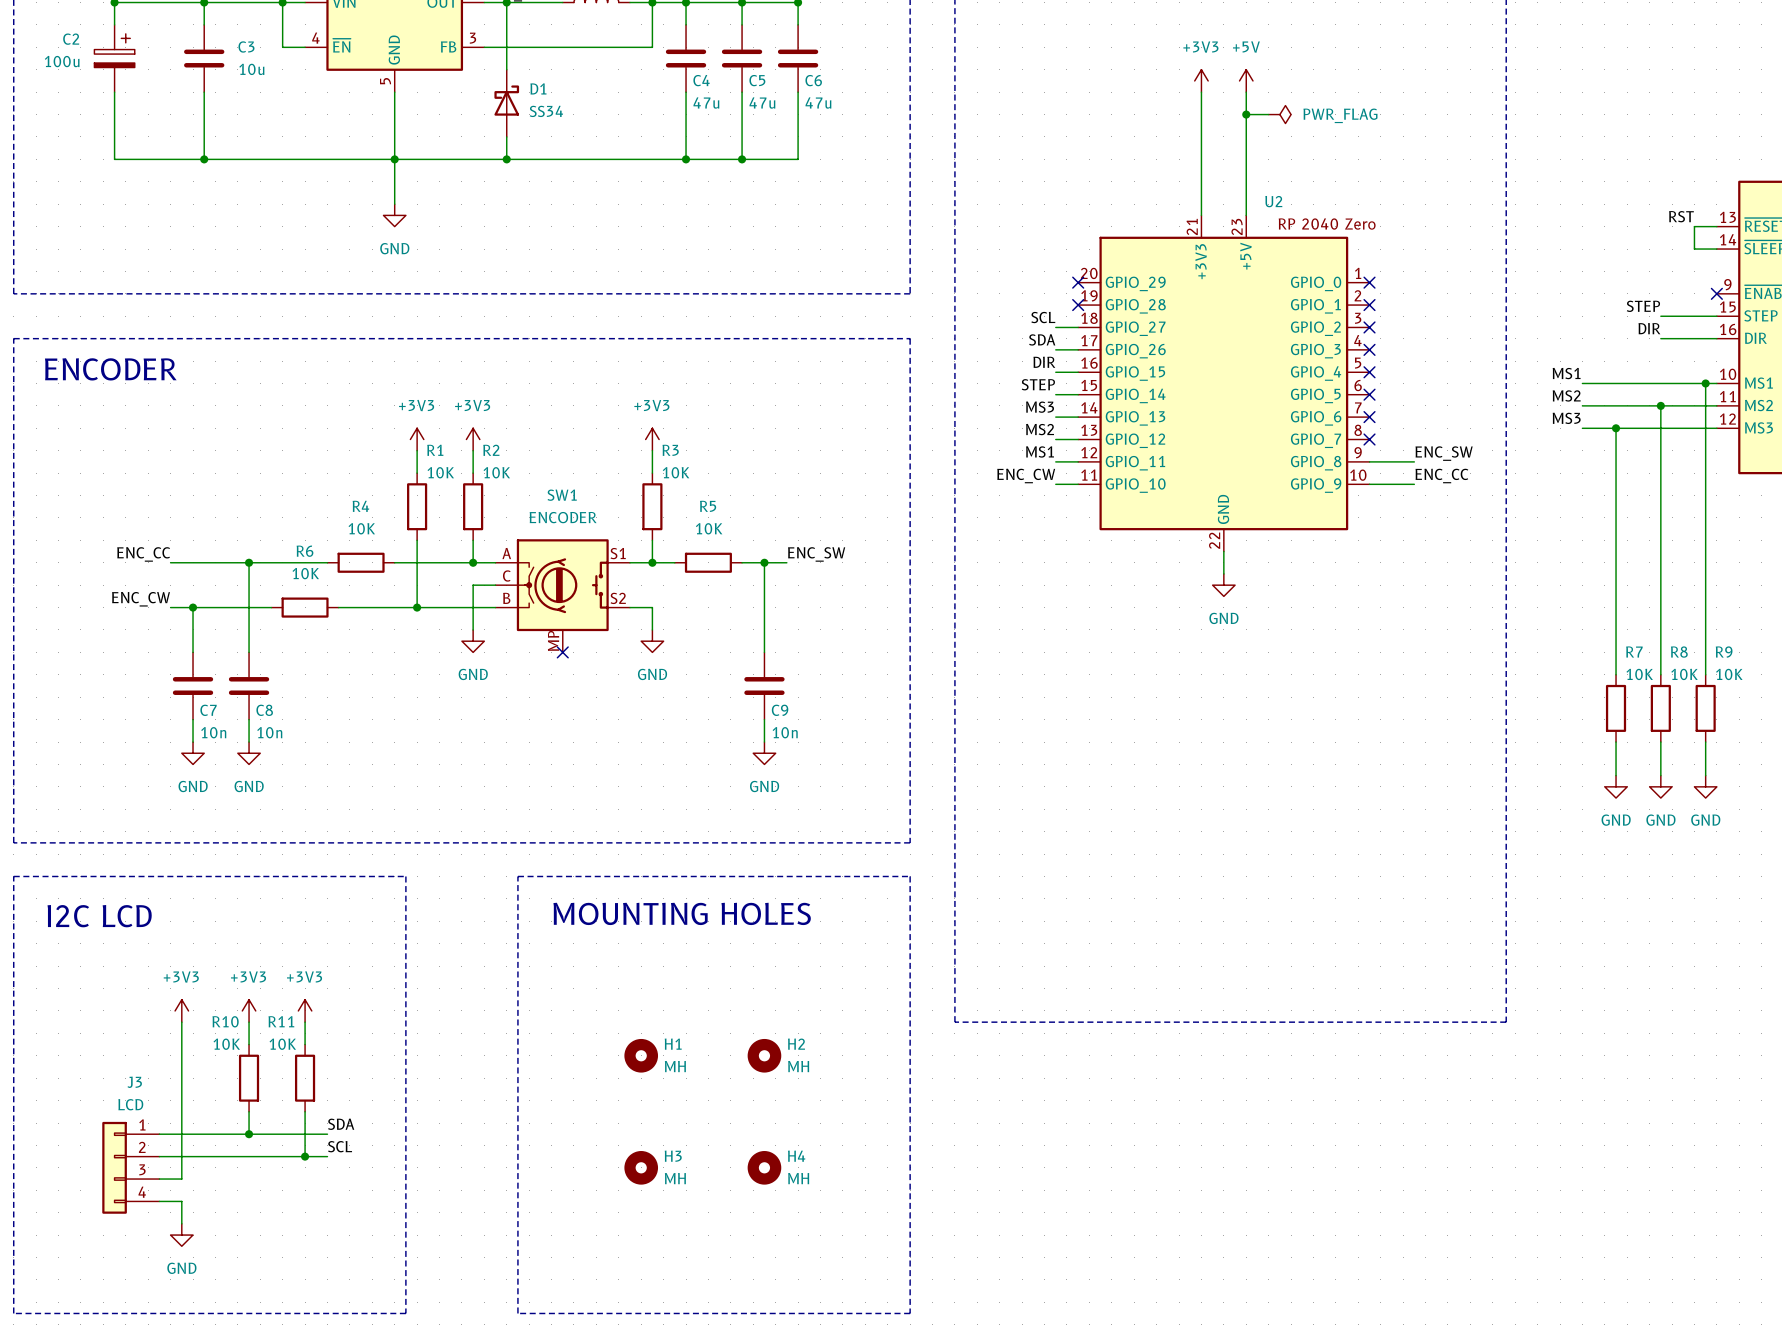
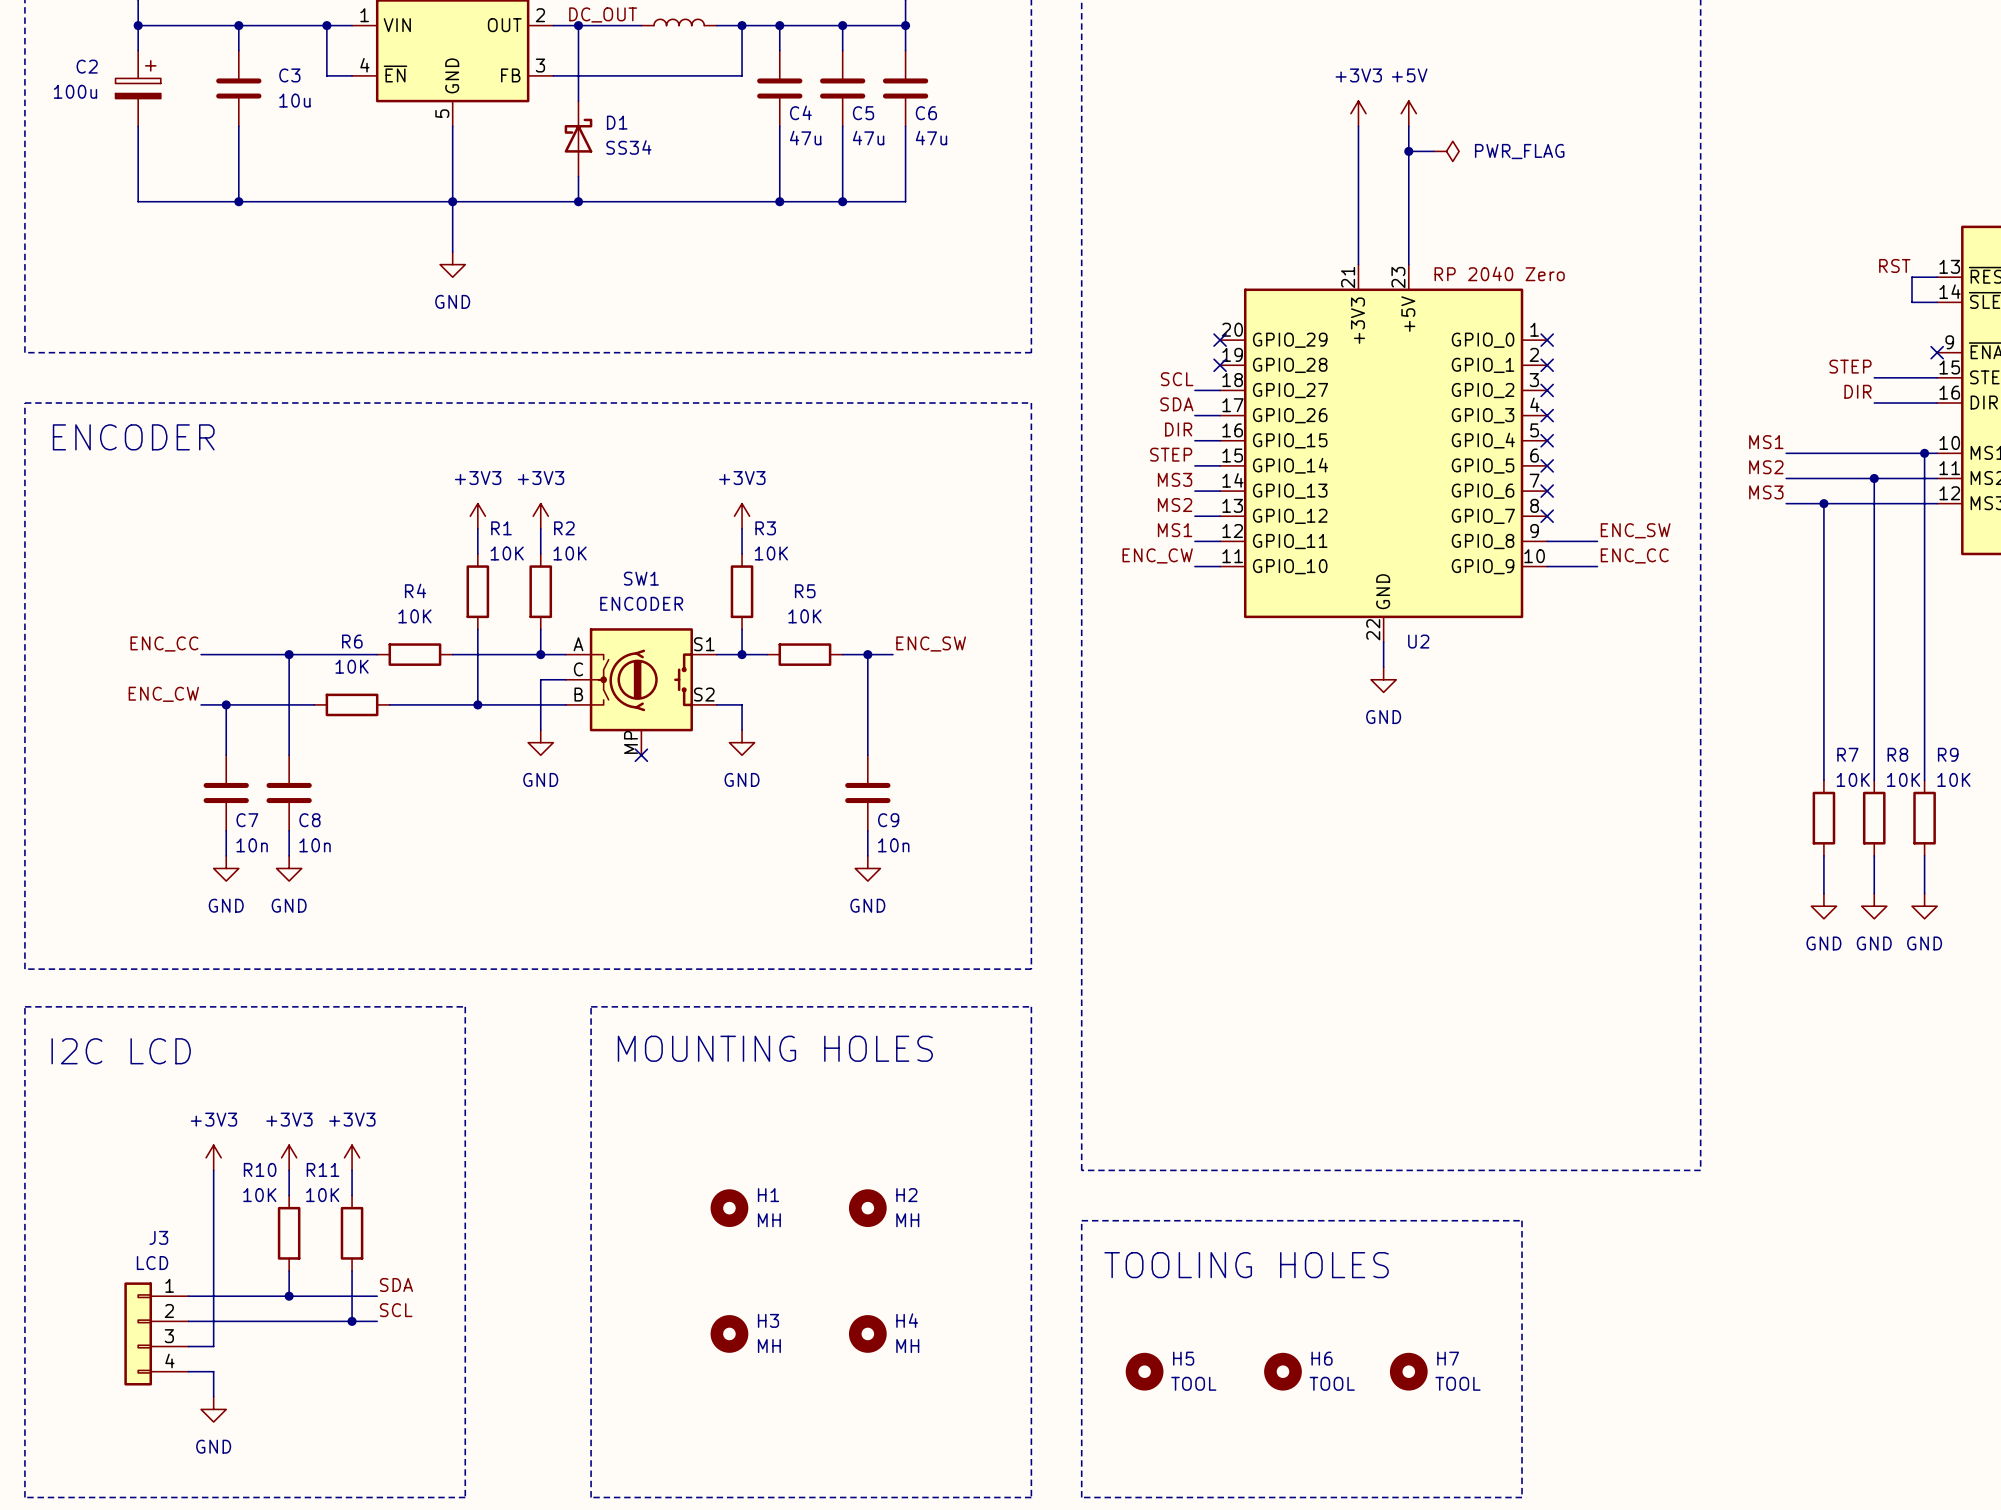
U2 name position: U2 (1273, 201) -> U2 (1418, 641)
line: none -> (1081, 1220) (1522, 1220) (1522, 1497) (1081, 1497) (1081, 1220)
text: none -> TOOLING HOLES (1246, 1265)
H5: none -> TOOL (1144, 1371)
H6: none -> TOOL (1282, 1371)
H7: none -> TOOL (1408, 1371)

